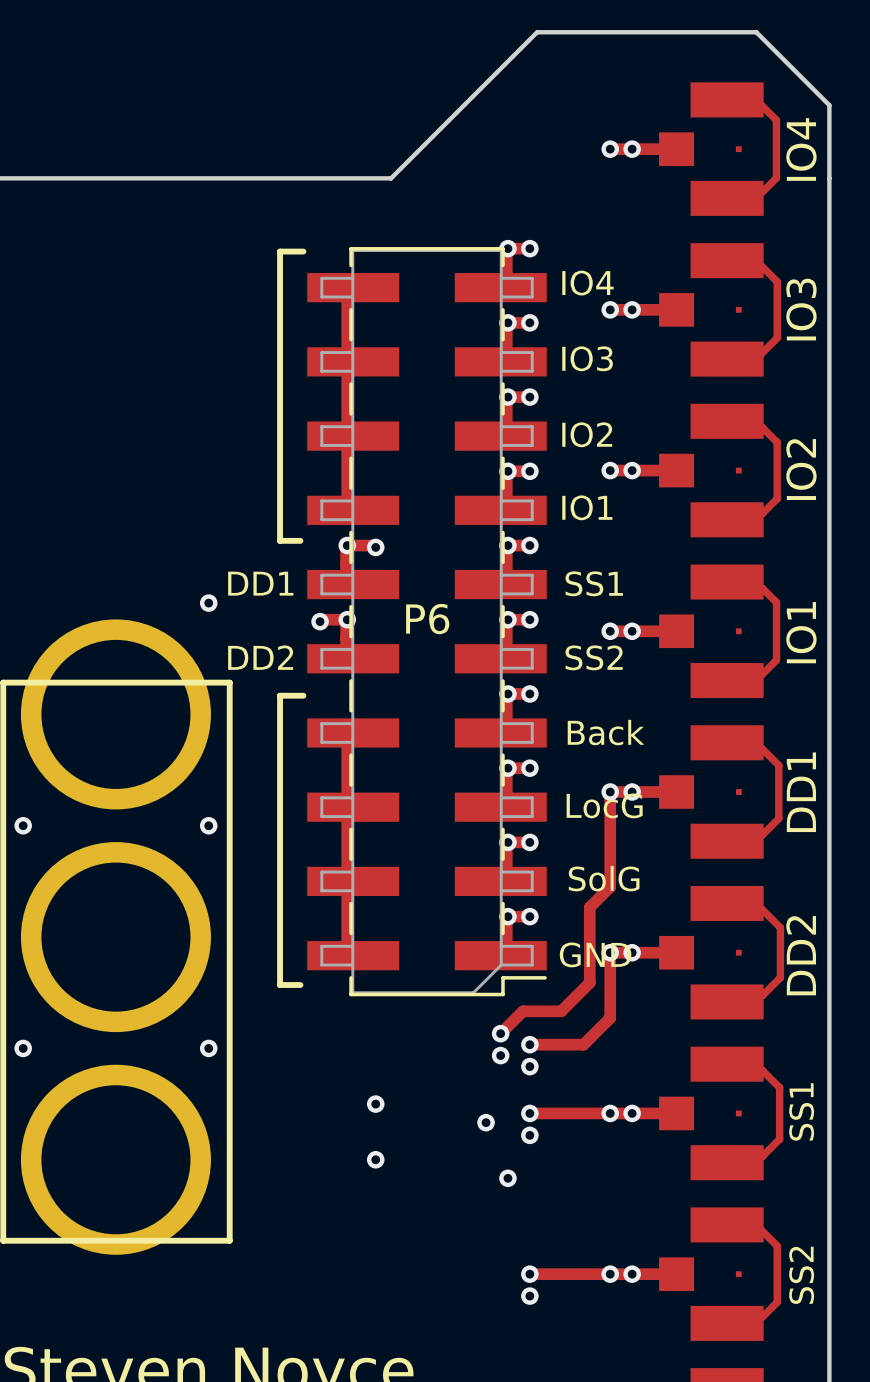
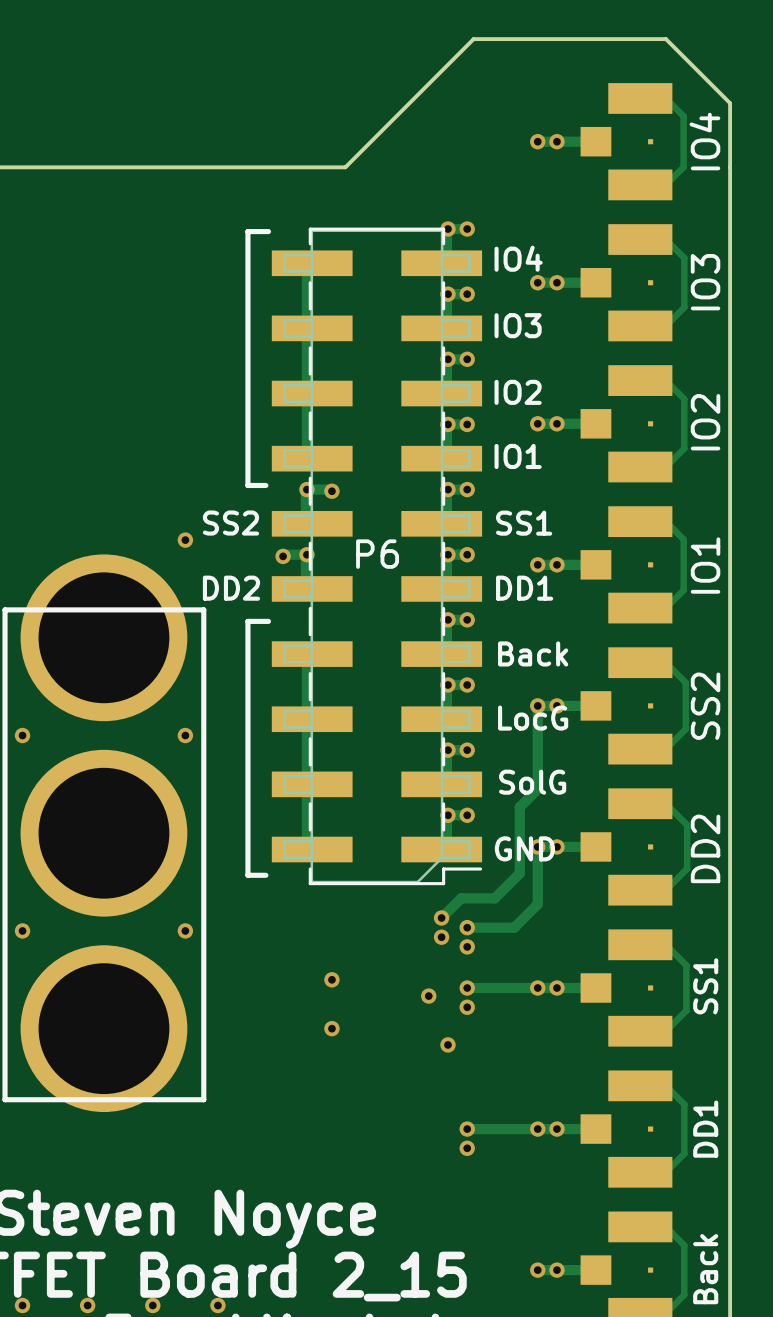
text: DD1 (260, 583) -> SS2 (230, 523)
text: SS2 (594, 657) -> DD1 (524, 588)
text: DD1 (801, 792) -> SS2 (705, 706)
text: SS2 (801, 1275) -> DD1 (705, 1129)

